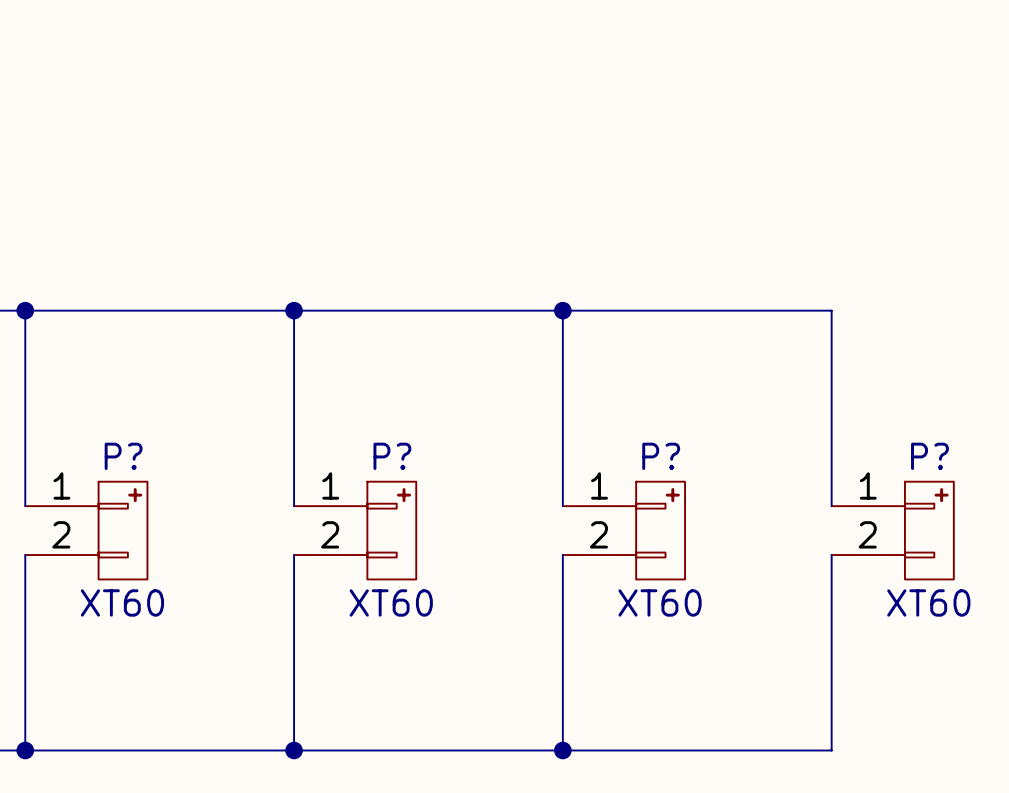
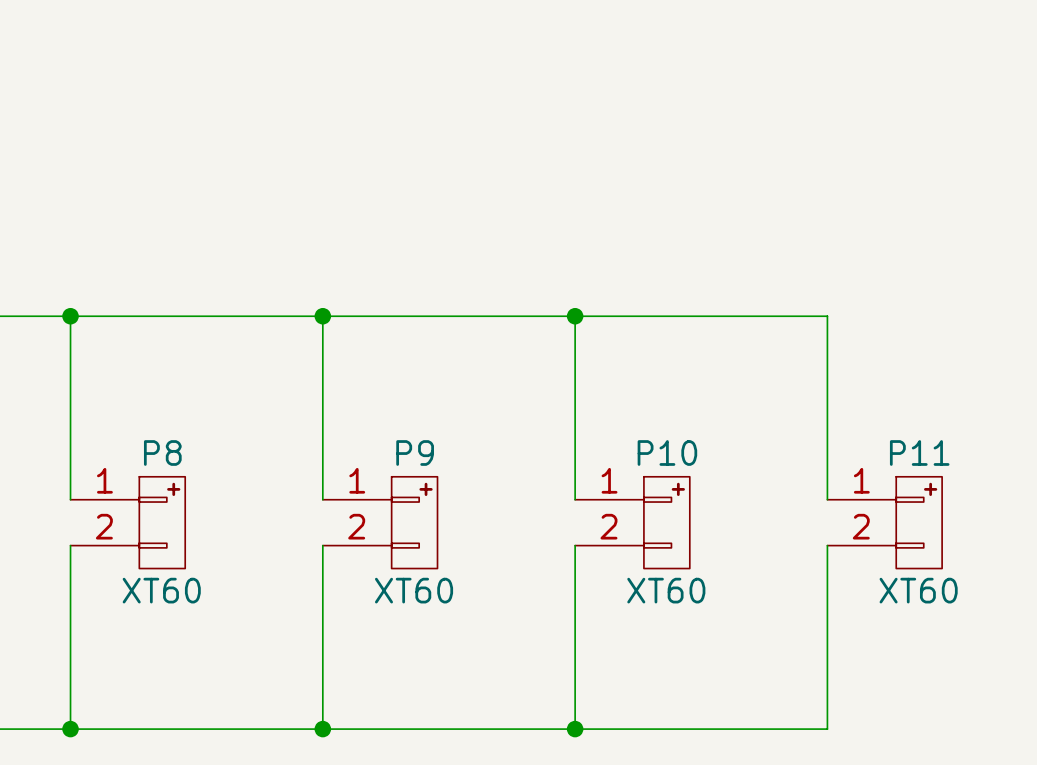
P? name: P? (123, 456) -> P8 (162, 453)
P? name: P? (392, 456) -> P9 (415, 453)
P? name: P? (661, 456) -> P10 (667, 453)
P? name: P? (929, 456) -> P11 (919, 453)

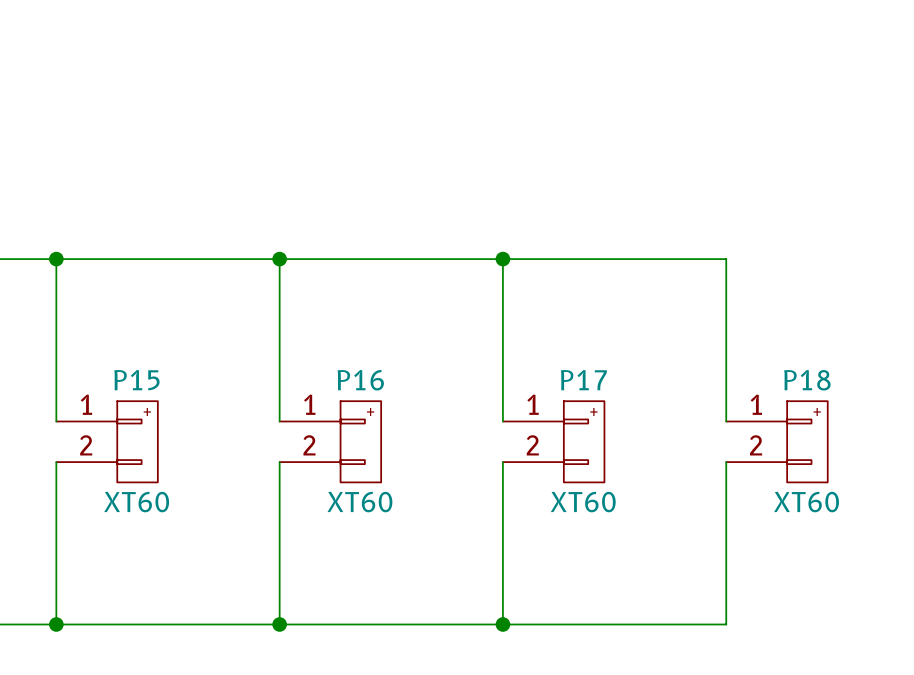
P8 name: P8 (162, 453) -> P15 (136, 380)
P9 name: P9 (415, 453) -> P16 (360, 380)
P10 name: P10 (667, 453) -> P17 (583, 380)
P11 name: P11 (919, 453) -> P18 (807, 380)

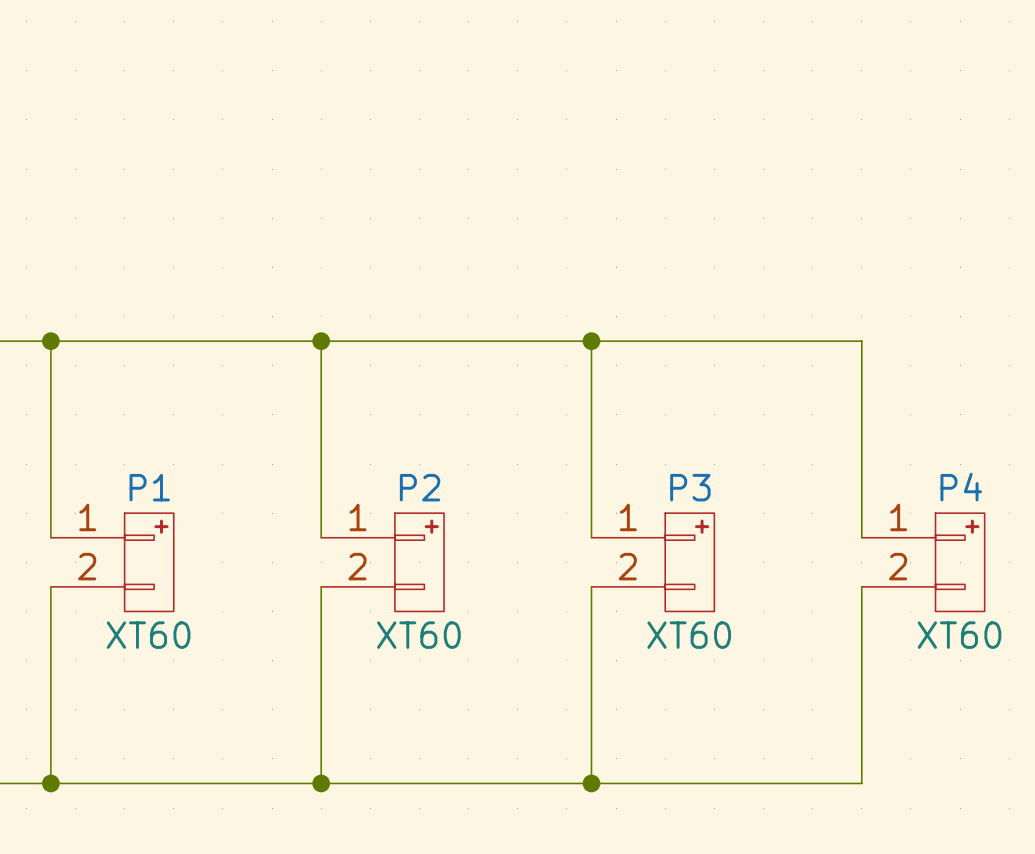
P15 name: P15 (136, 380) -> P1 (149, 487)
P16 name: P16 (360, 380) -> P2 (420, 487)
P17 name: P17 (583, 380) -> P3 (690, 487)
P18 name: P18 (807, 380) -> P4 (961, 487)

